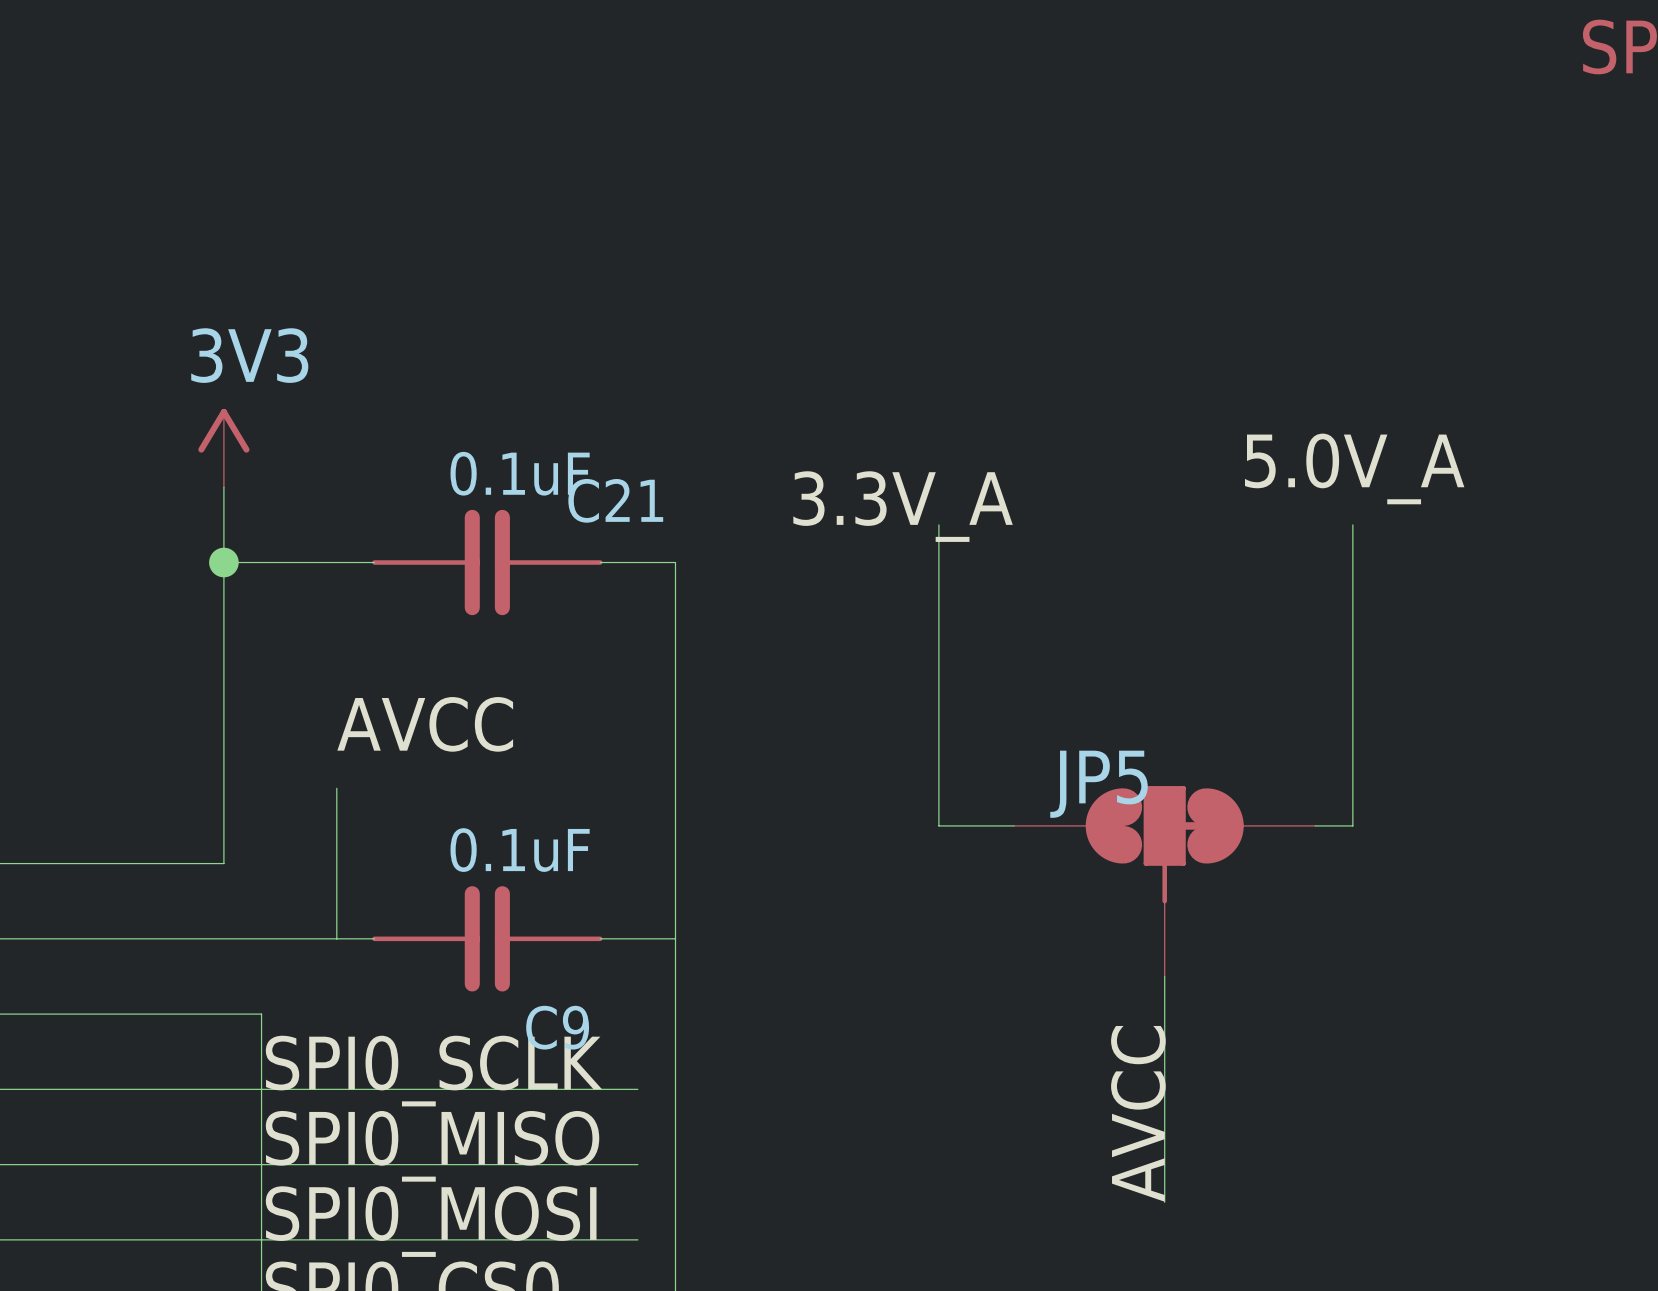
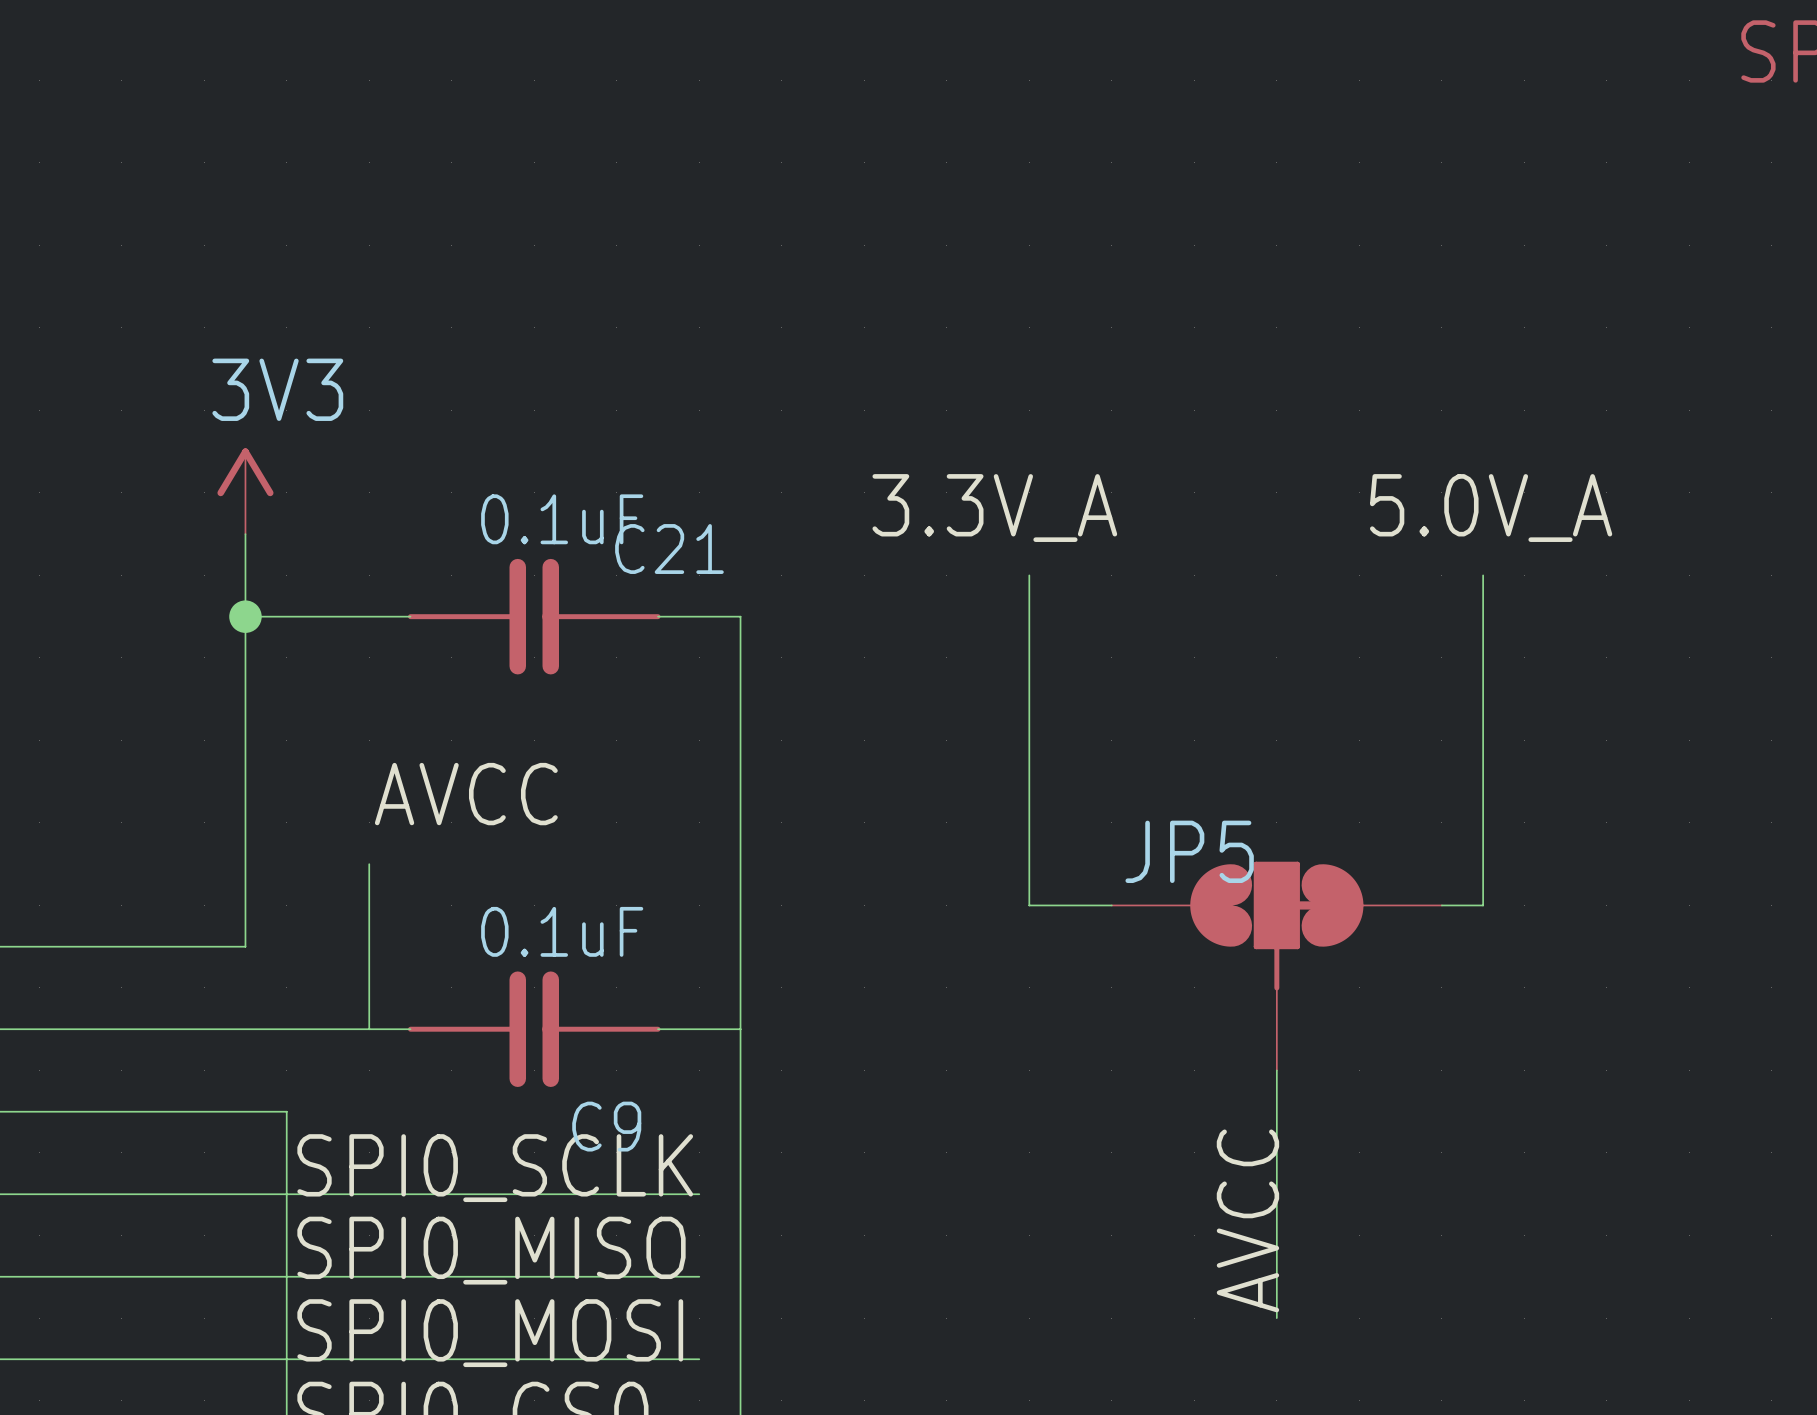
label position: 3.3V_A (903, 506) -> 3.3V_A (994, 508)

